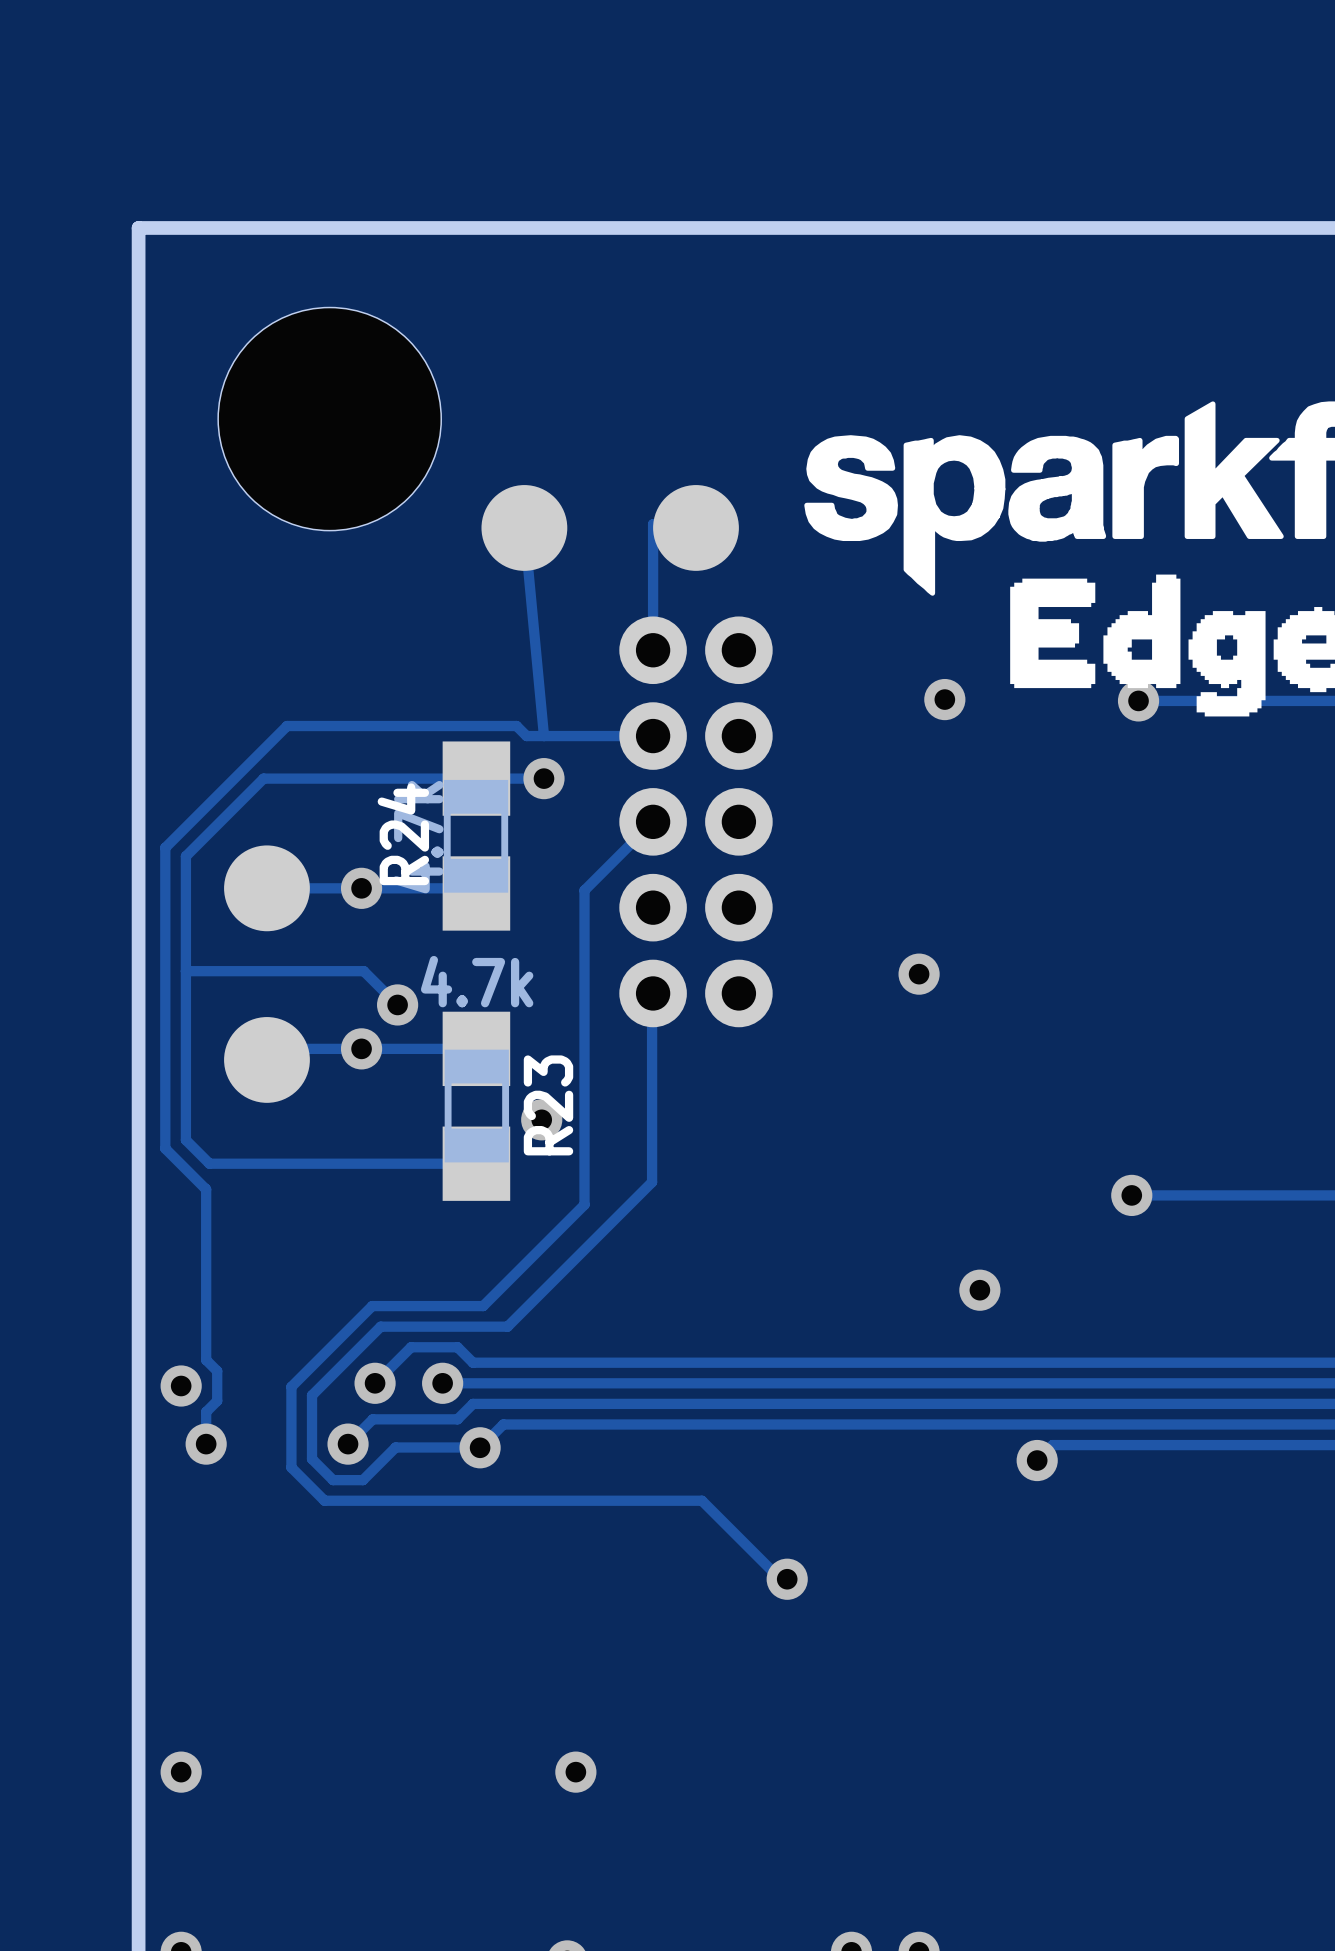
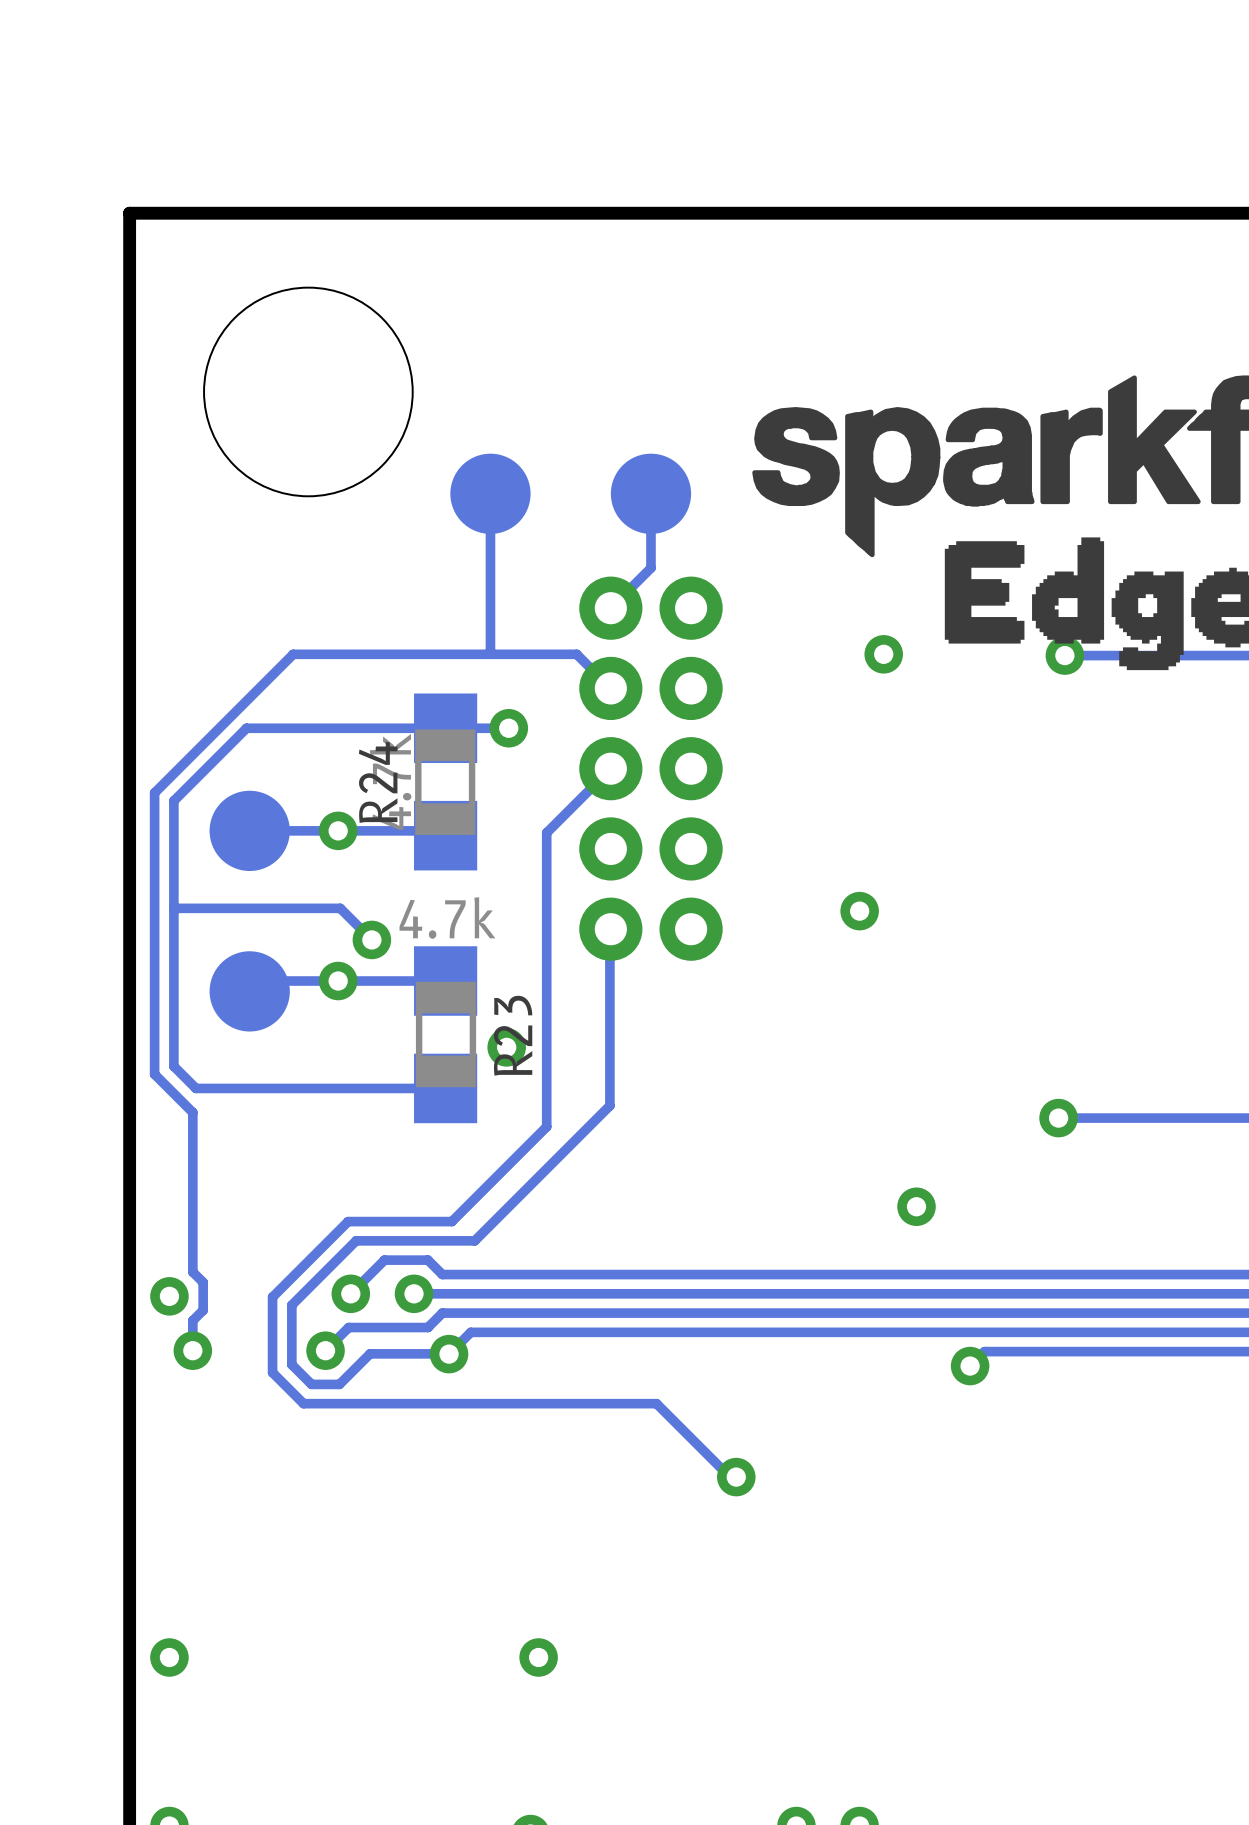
track: (524, 527) (543, 736) -> (490, 493) (490, 654)
track: (696, 527) (653, 524) (653, 650) -> (650, 493) (650, 568) (610, 608)
track: (287, 726) (516, 726) (526, 736) (653, 736) -> (268, 679) (293, 654) (576, 654) (610, 688)

